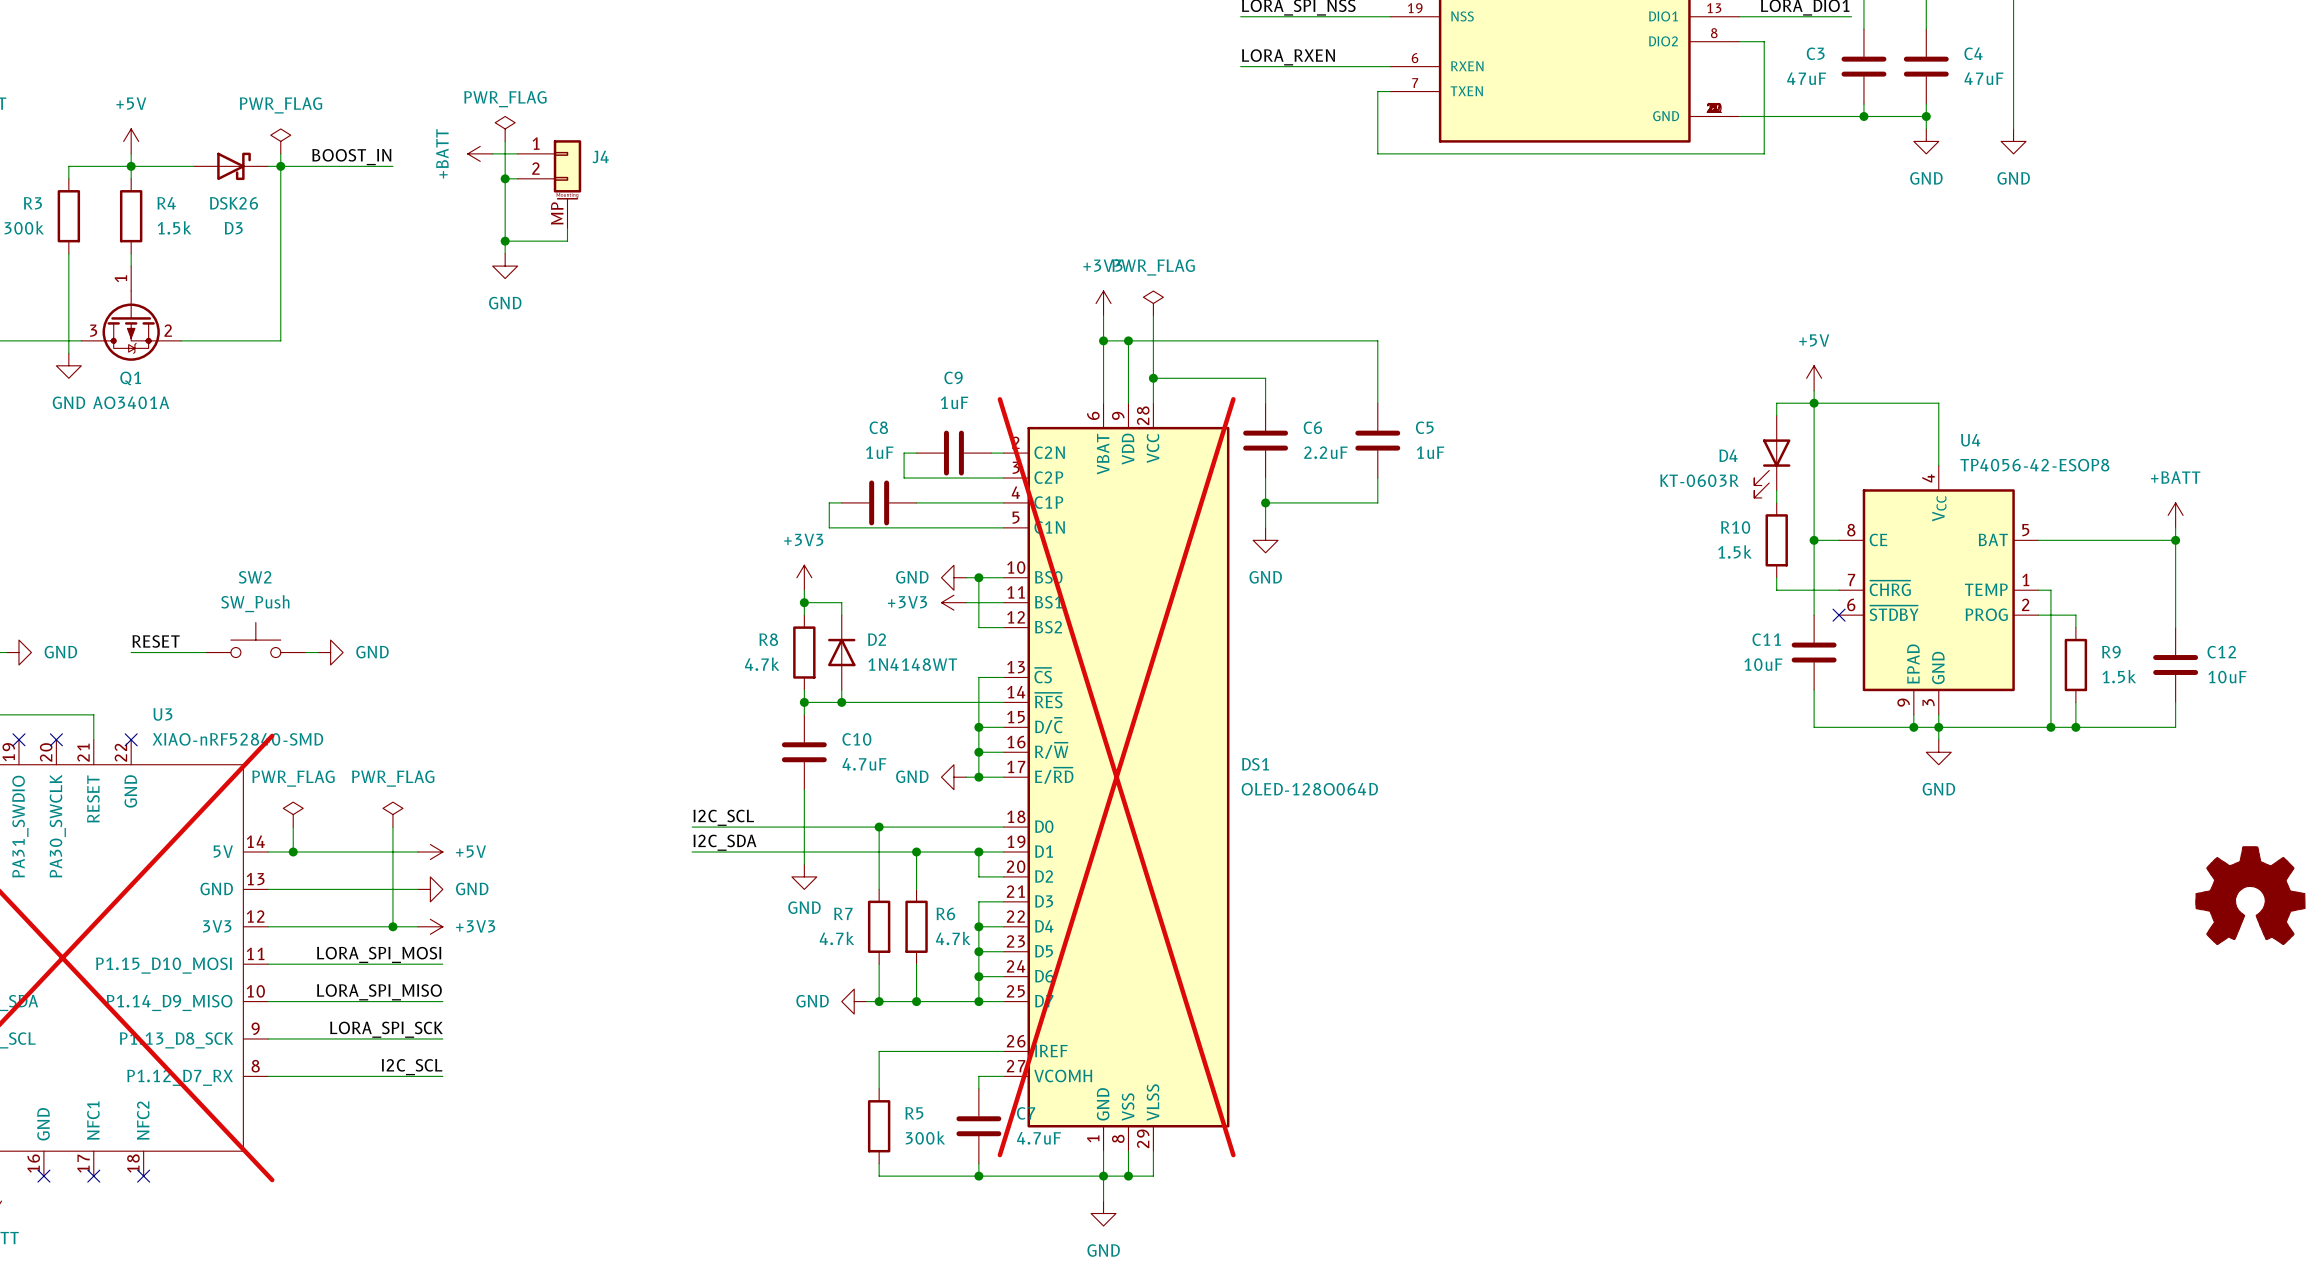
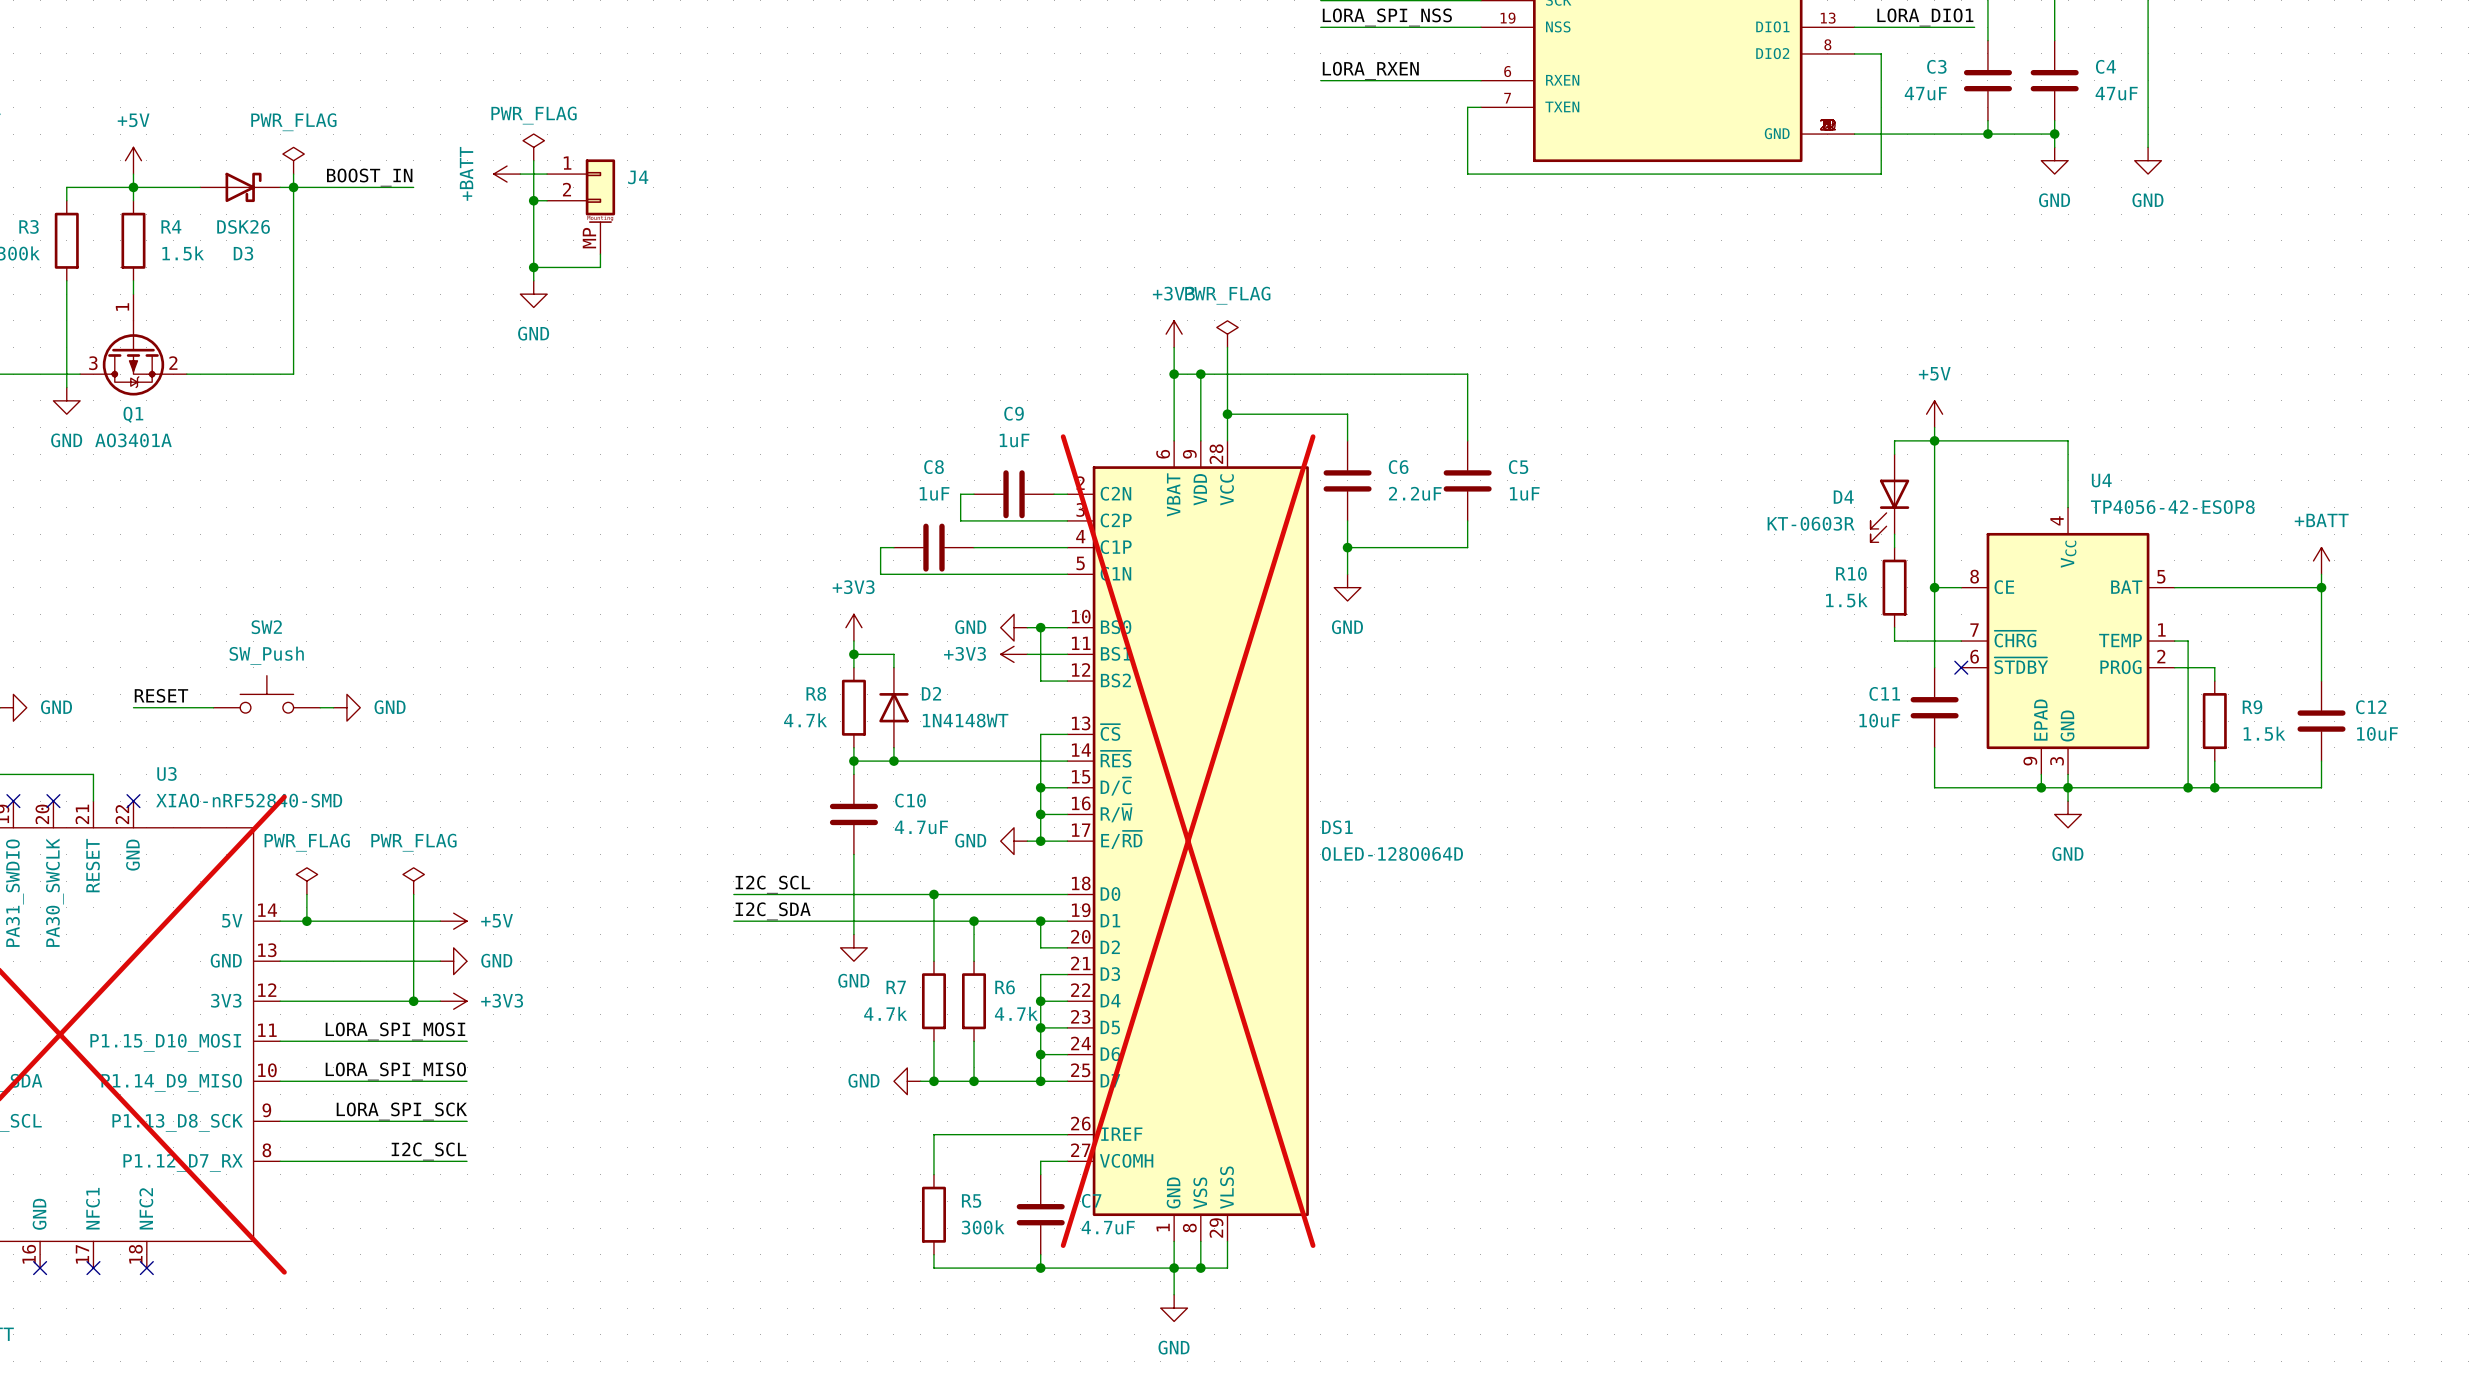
part: (2250, 895) -> none

